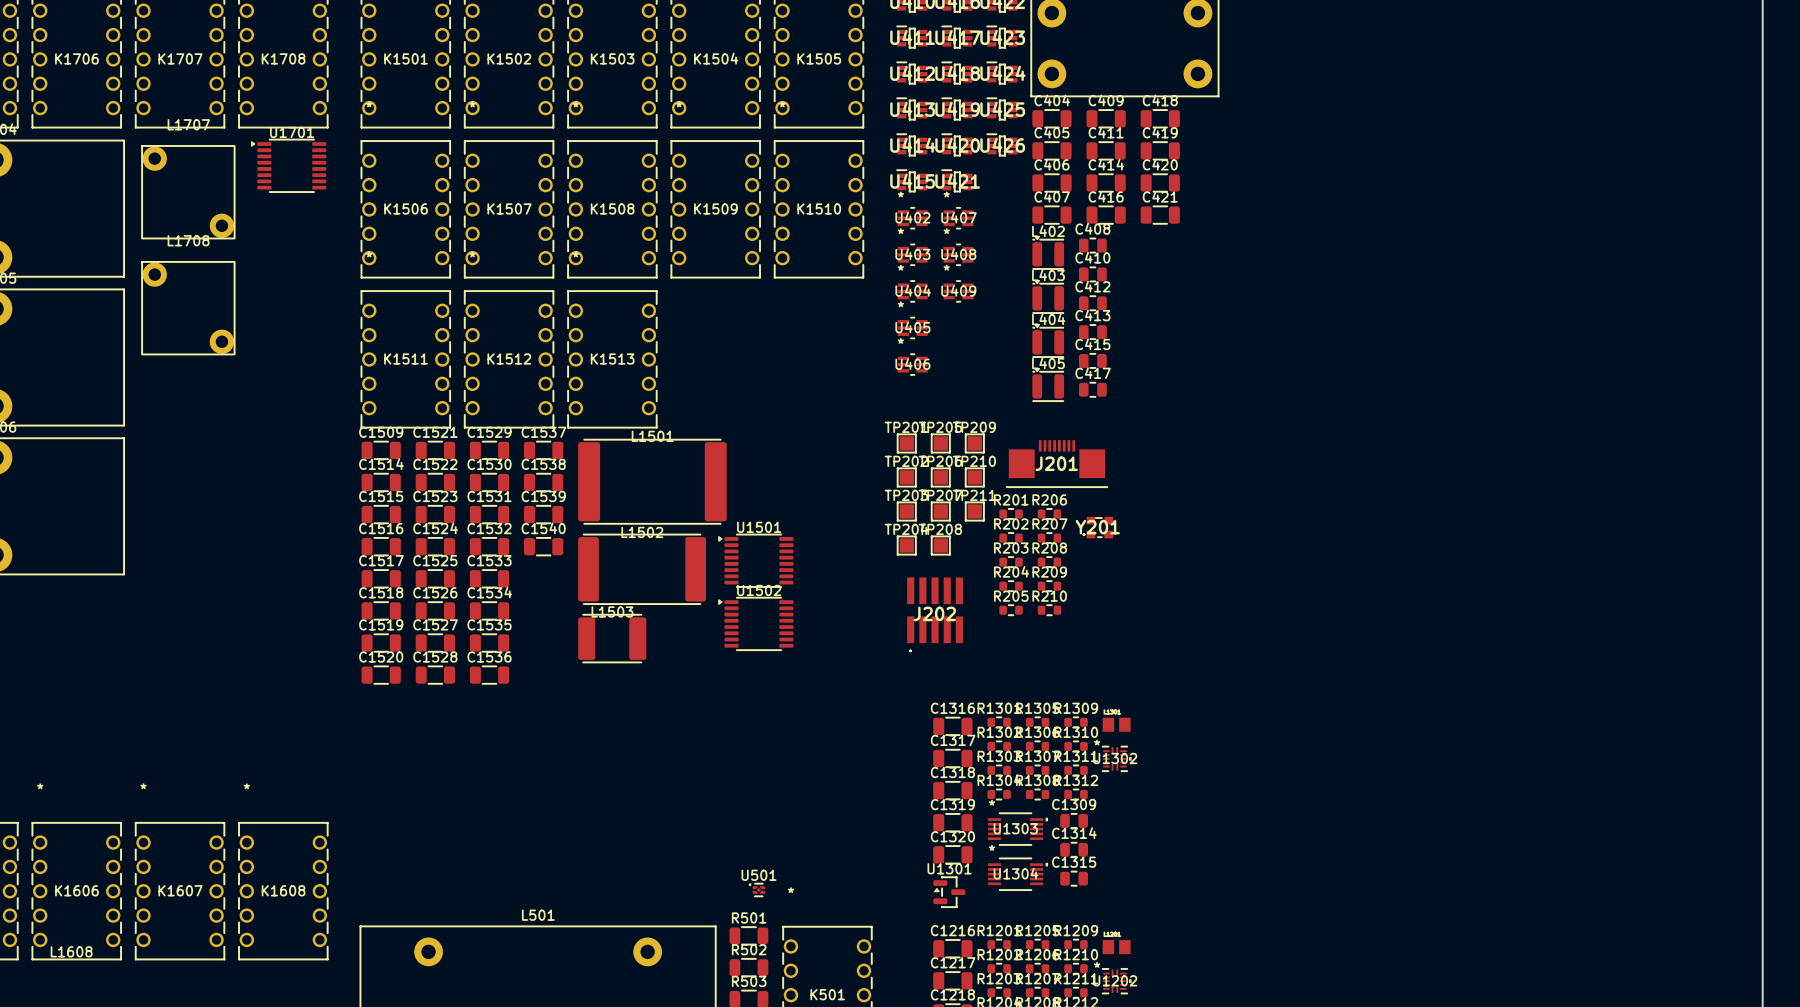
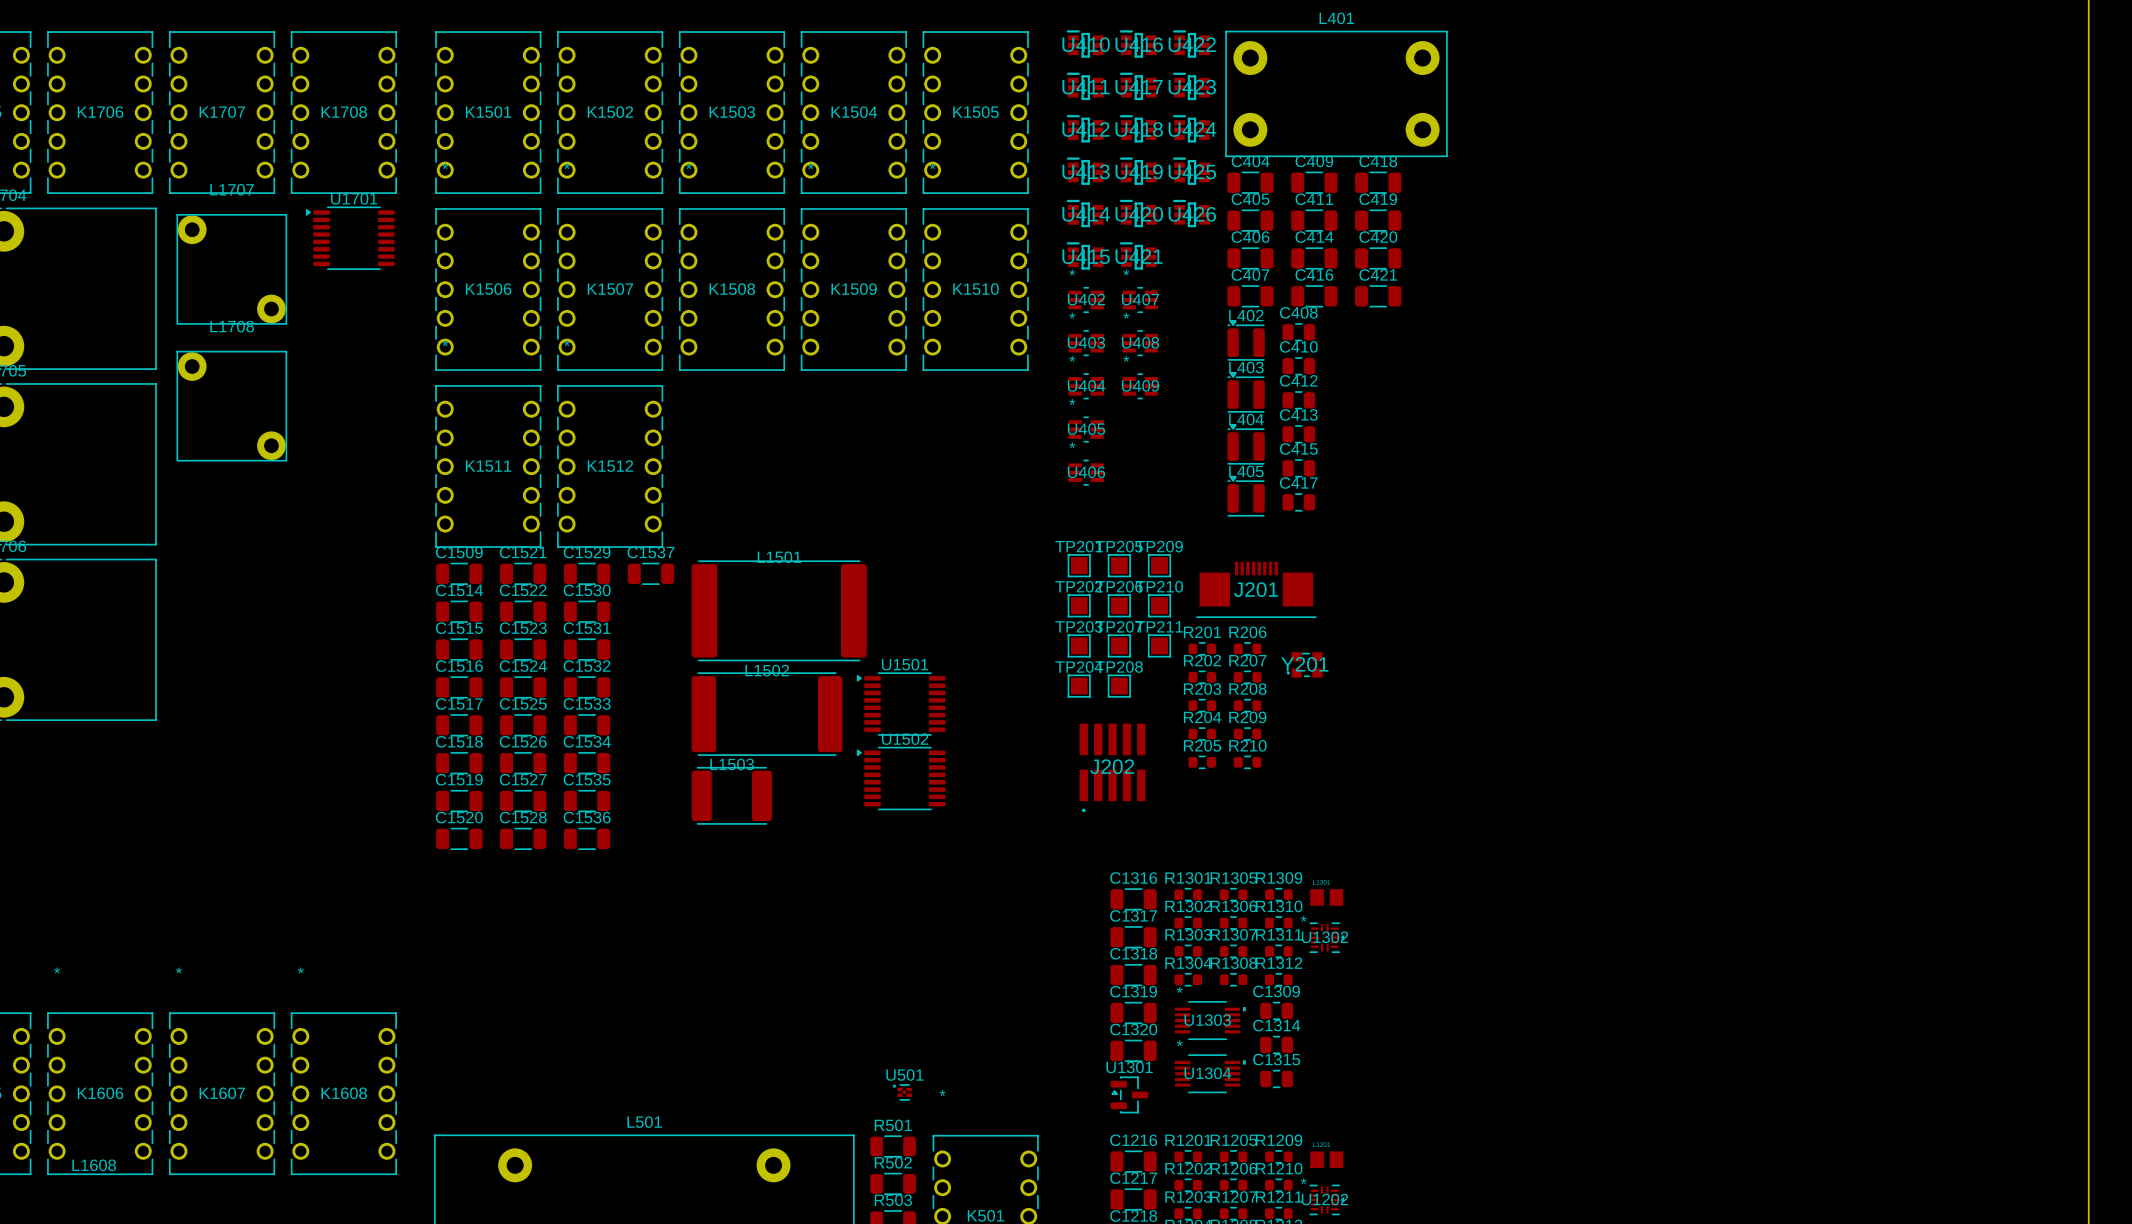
K1513: (612, 359) -> none
C1538: (543, 482) -> none
C1539: (543, 514) -> none
C1540: (543, 546) -> none

